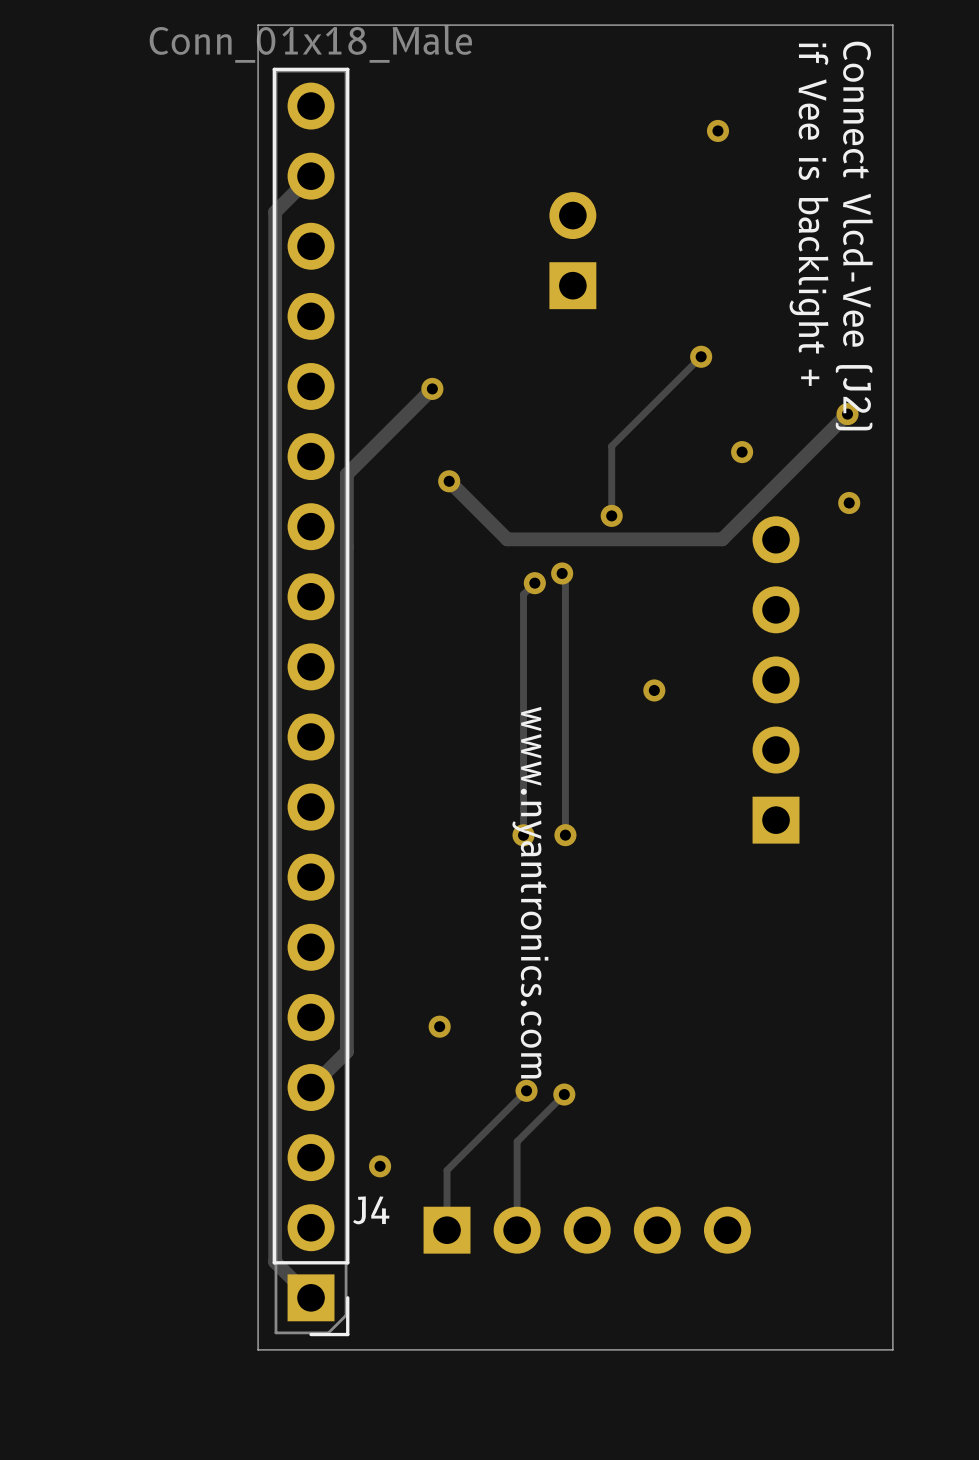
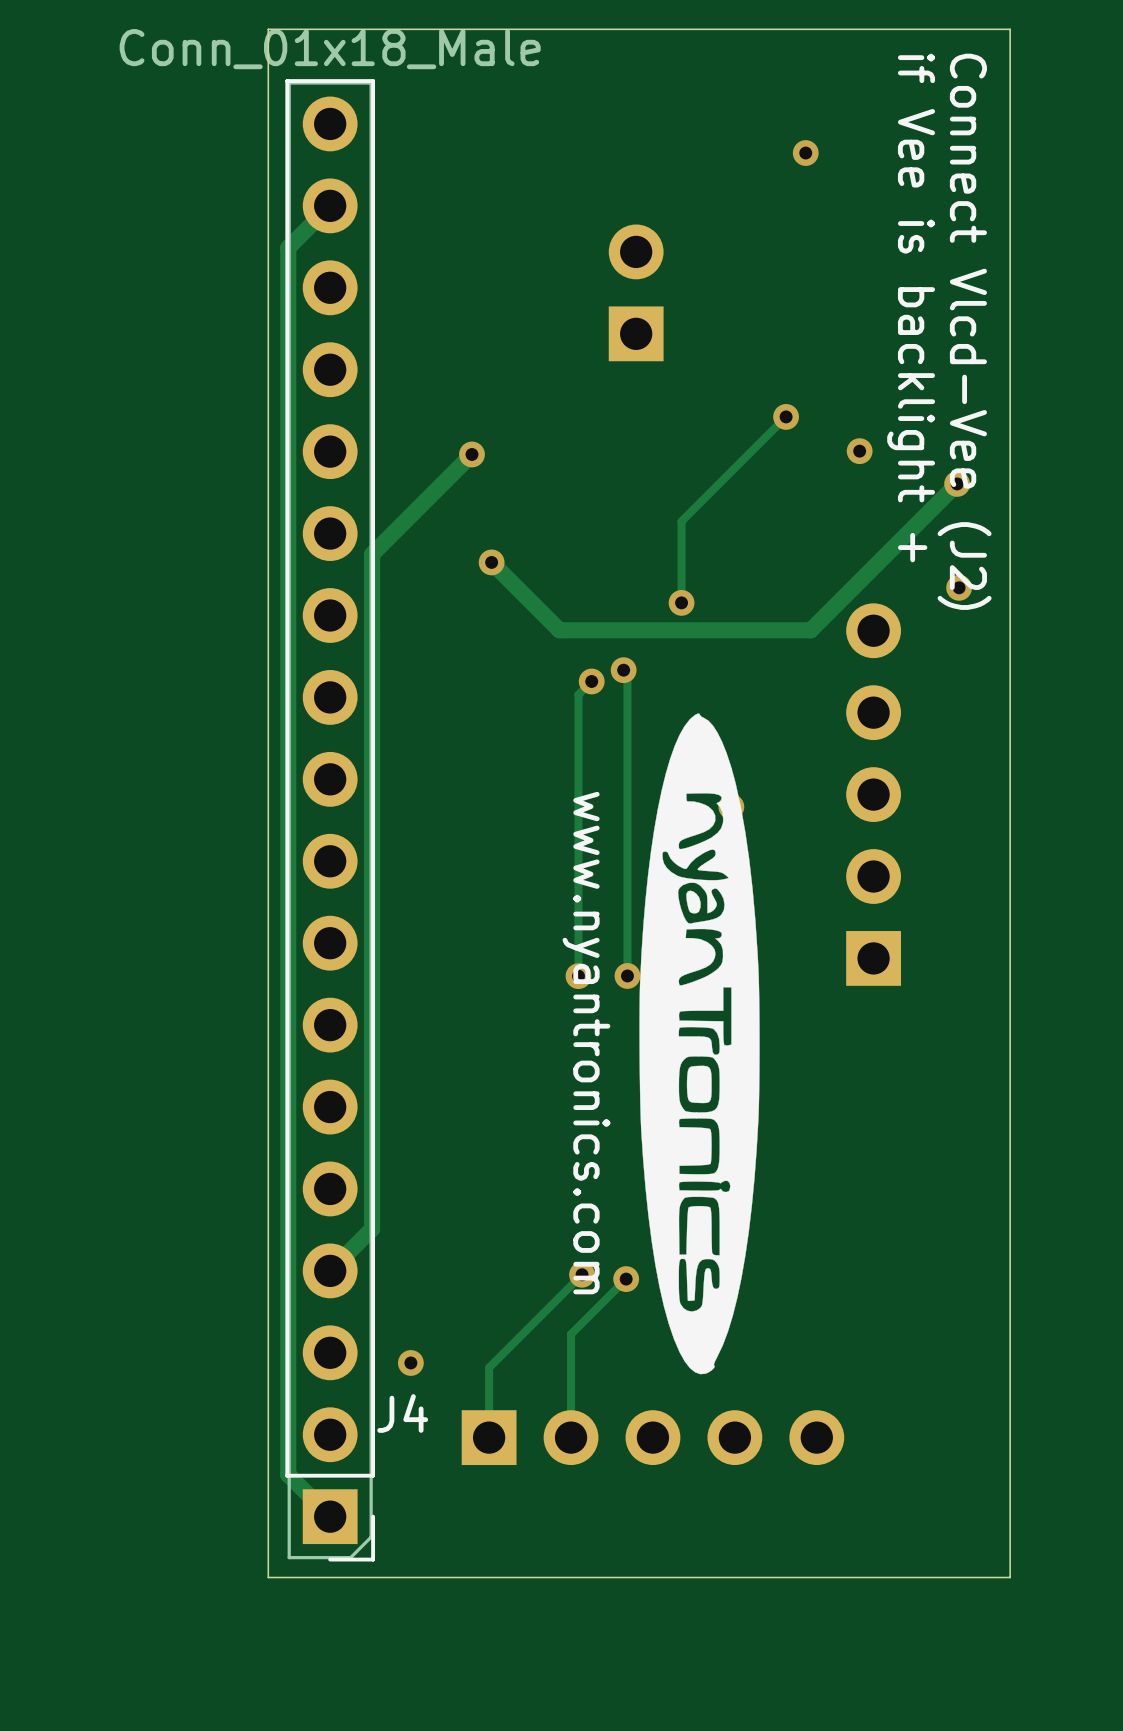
via position: (742, 452) -> (859, 451)
drawing: none -> [639, 713, 760, 1375]
via: (439, 1026) -> none

